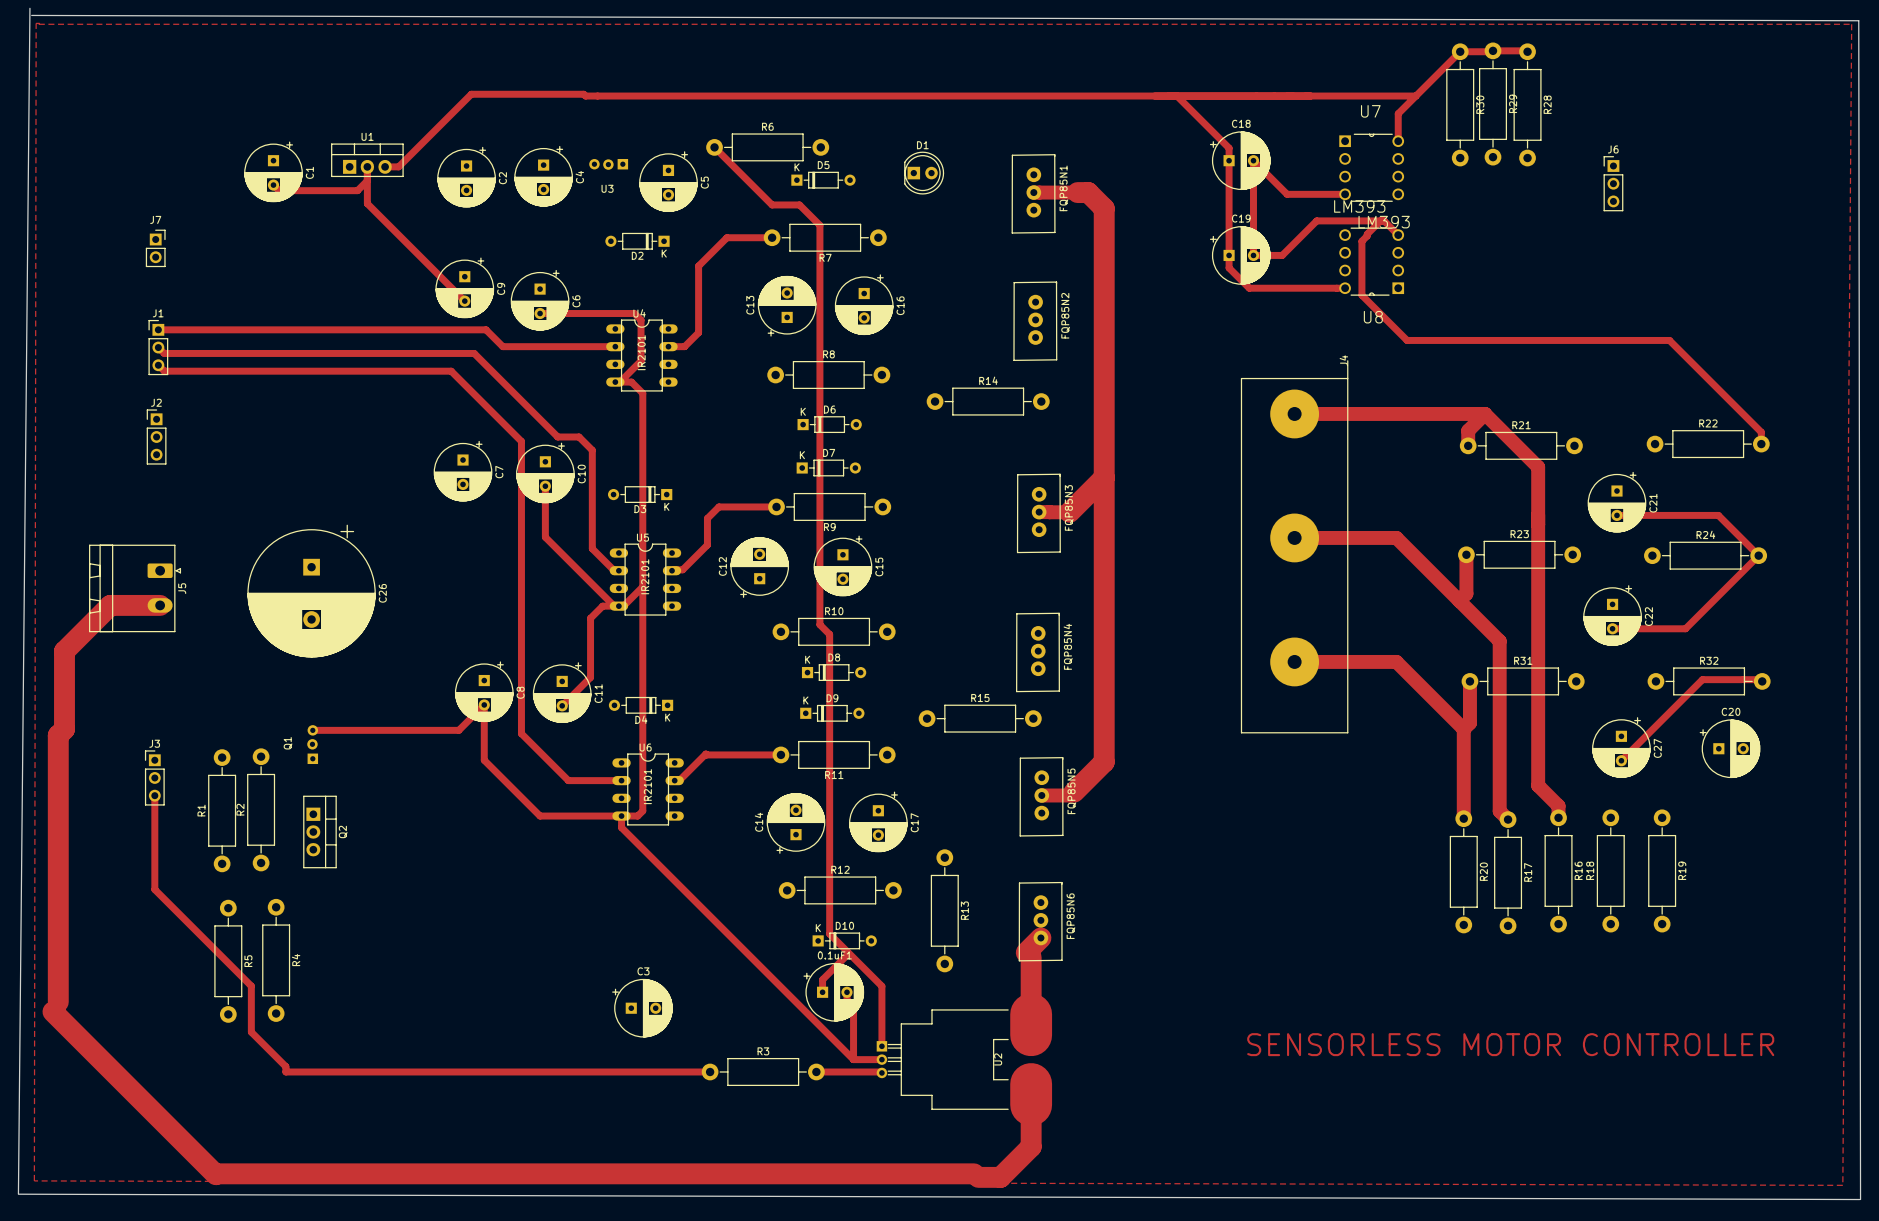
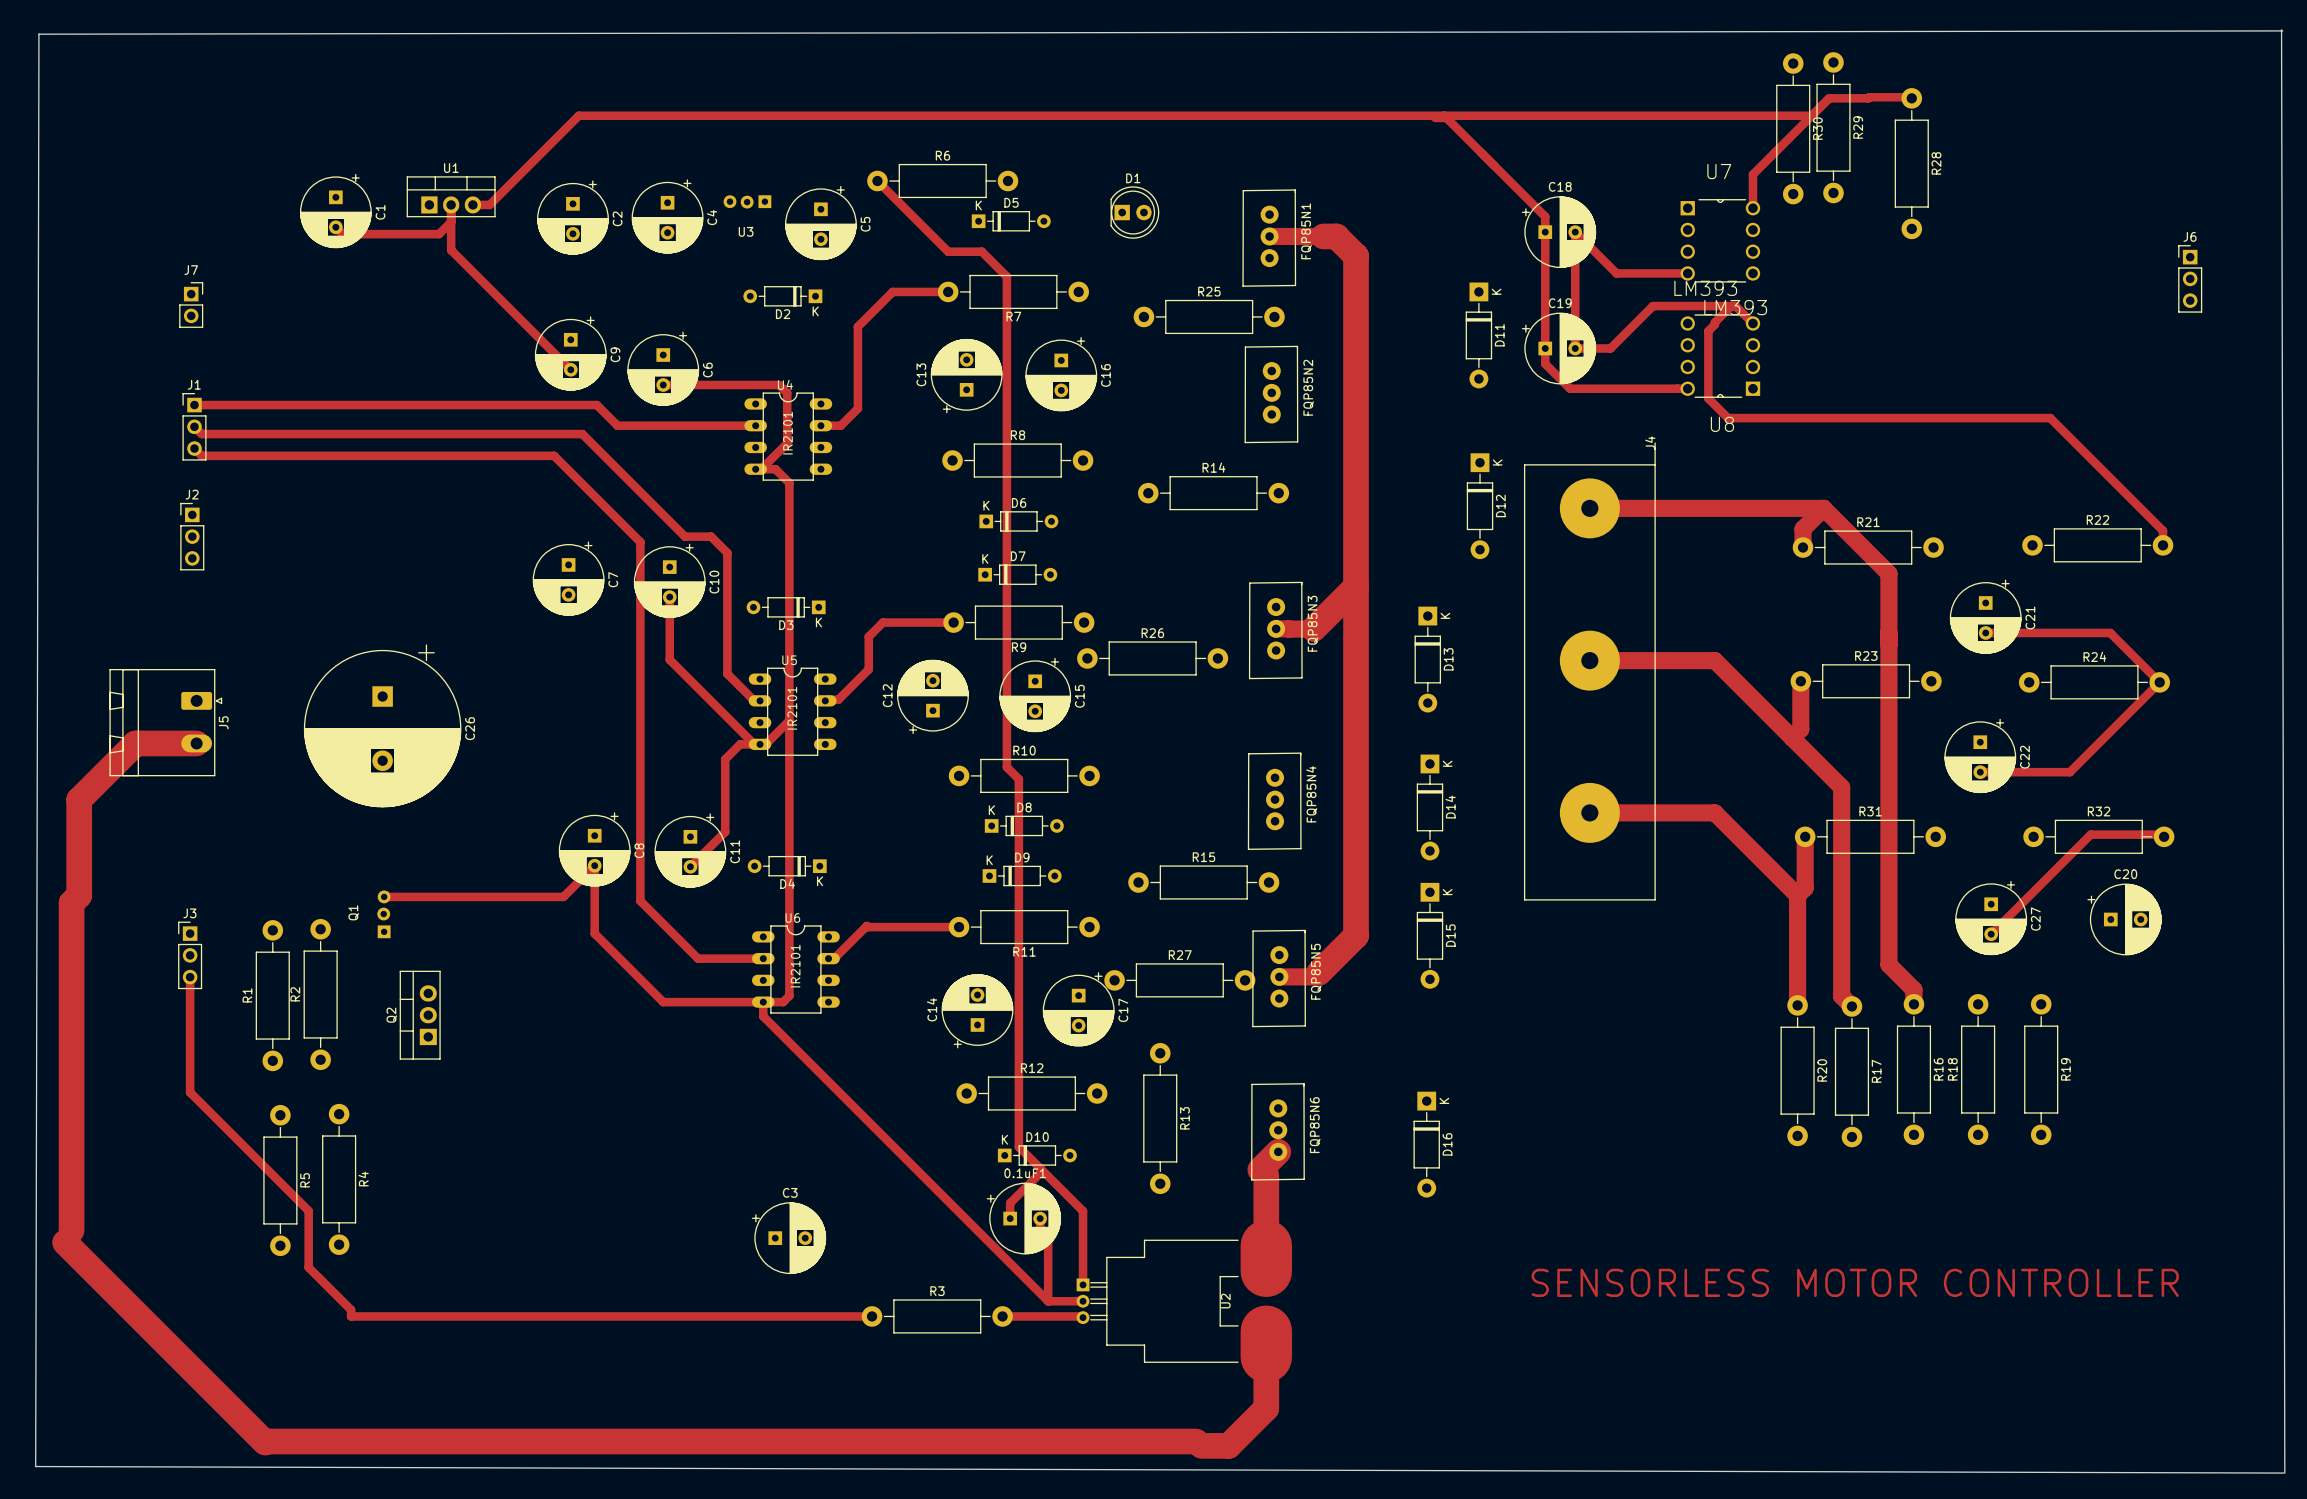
board edge: (29, 8) (18, 1194) -> none
board edge: (31, 15) (1858, 20) (1860, 1199) -> (2281, 29) (2284, 1473)
zone outline: (36, 23) (34, 1180) (1842, 1185) (1851, 24) (36, 23) -> none
track: (1527, 51) (1460, 51) (1398, 113) (1398, 141) -> (1911, 98) (1829, 98) (1752, 174) (1752, 208)
track: (583, 94) (585, 96) (1168, 96) -> (716, 115) (1811, 115)
track: none -> (1444, 115) (1545, 216) (1545, 363) (1570, 388) (1687, 388)
track: (1415, 96) (1176, 96) (1229, 148) (1229, 267) (1249, 288) (1345, 288) -> none
R28 position: (1527, 104) -> (1911, 163)
C18 position: (1240, 160) -> (1559, 232)
U7 position: (1371, 167) -> (1720, 240)
J6 position: (1613, 183) -> (2190, 278)
track: (1345, 194) (1287, 194) (1253, 160) (1253, 255) (1282, 255) (1316, 220) (1384, 220) (1398, 235) -> (1687, 273) (1616, 273) (1575, 232) (1575, 348) (1610, 348) (1652, 306) (1735, 306) (1752, 323)
track: (1380, 220) (1361, 241) (1361, 295) (1391, 324) -> (1731, 306) (1708, 331) (1708, 398)
C19 position: (1240, 255) -> (1559, 348)
R25: none -> (1209, 316)
U8 position: (1371, 261) -> (1720, 356)
D11: none -> (1478, 335)
D12: none -> (1480, 506)
R26: none -> (1152, 658)
D13: none -> (1427, 659)
D14: none -> (1429, 807)
D15: none -> (1429, 935)
R27: none -> (1179, 980)
Q2 rotation: 0° (319, 831) -> 180° (420, 1015)
D16: none -> (1426, 1144)
board edge: (19, 1194) (1859, 1199) -> (2282, 30) (38, 34) (35, 1466) (2283, 1473)

